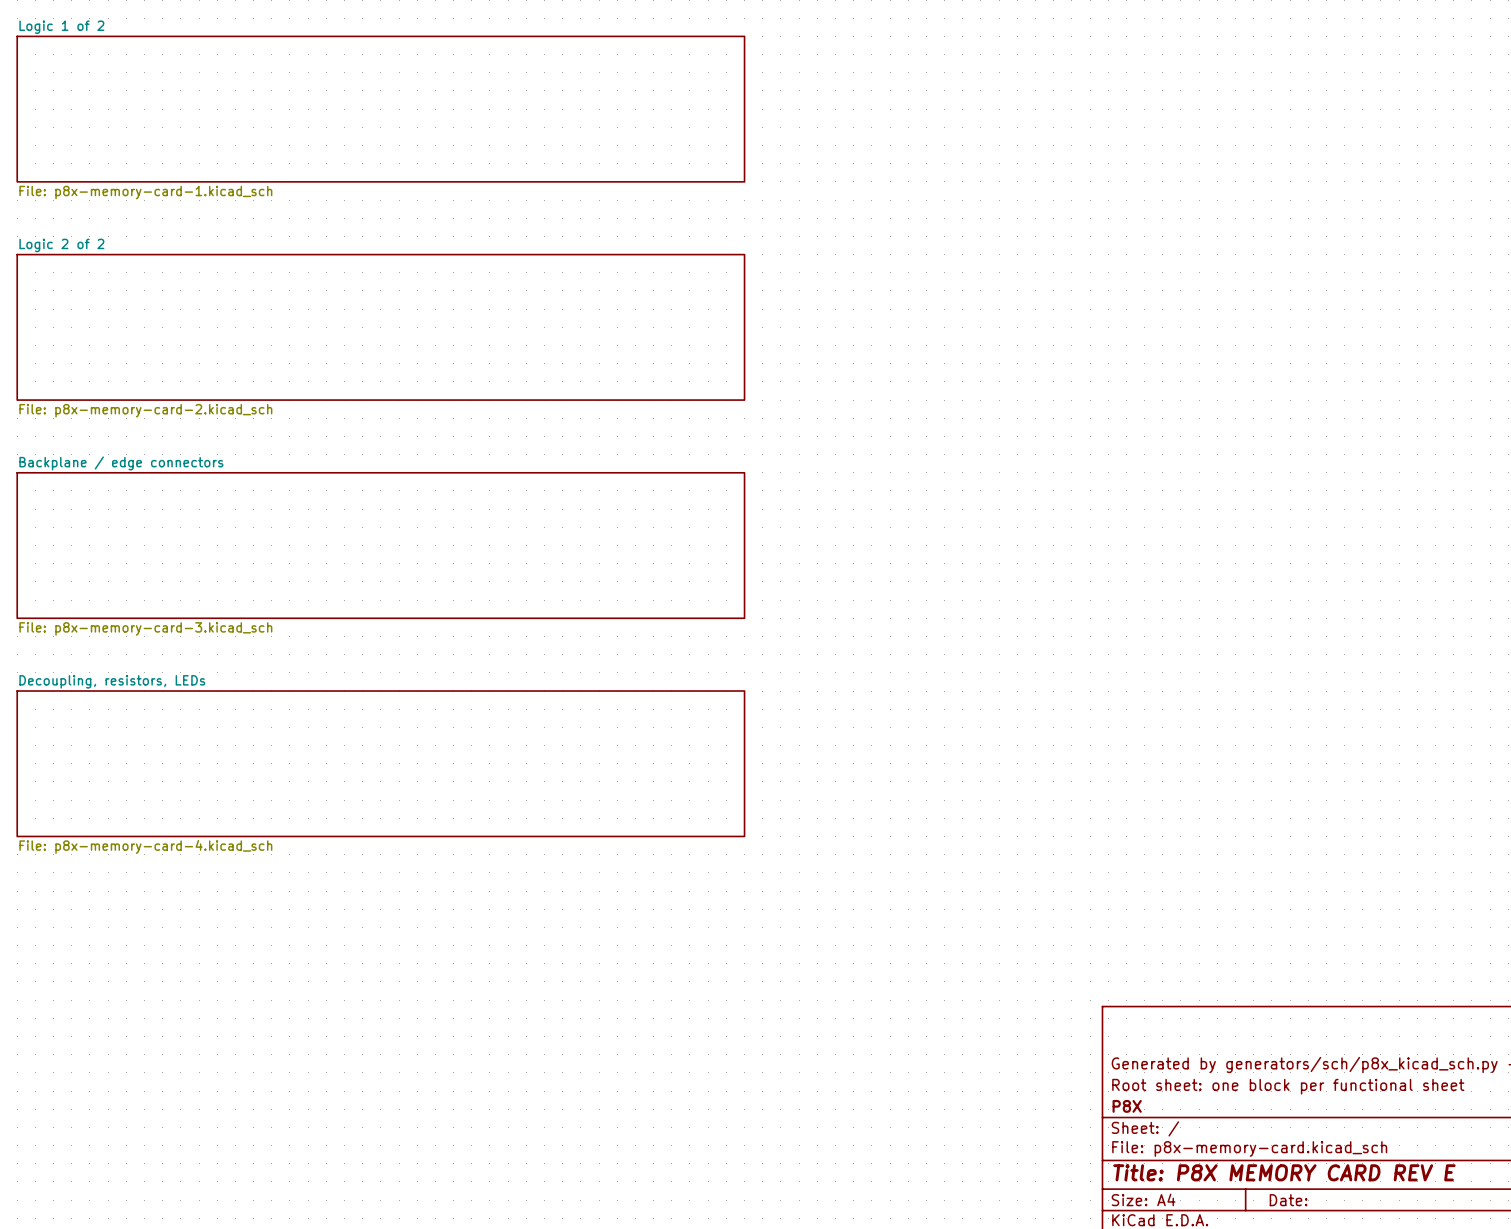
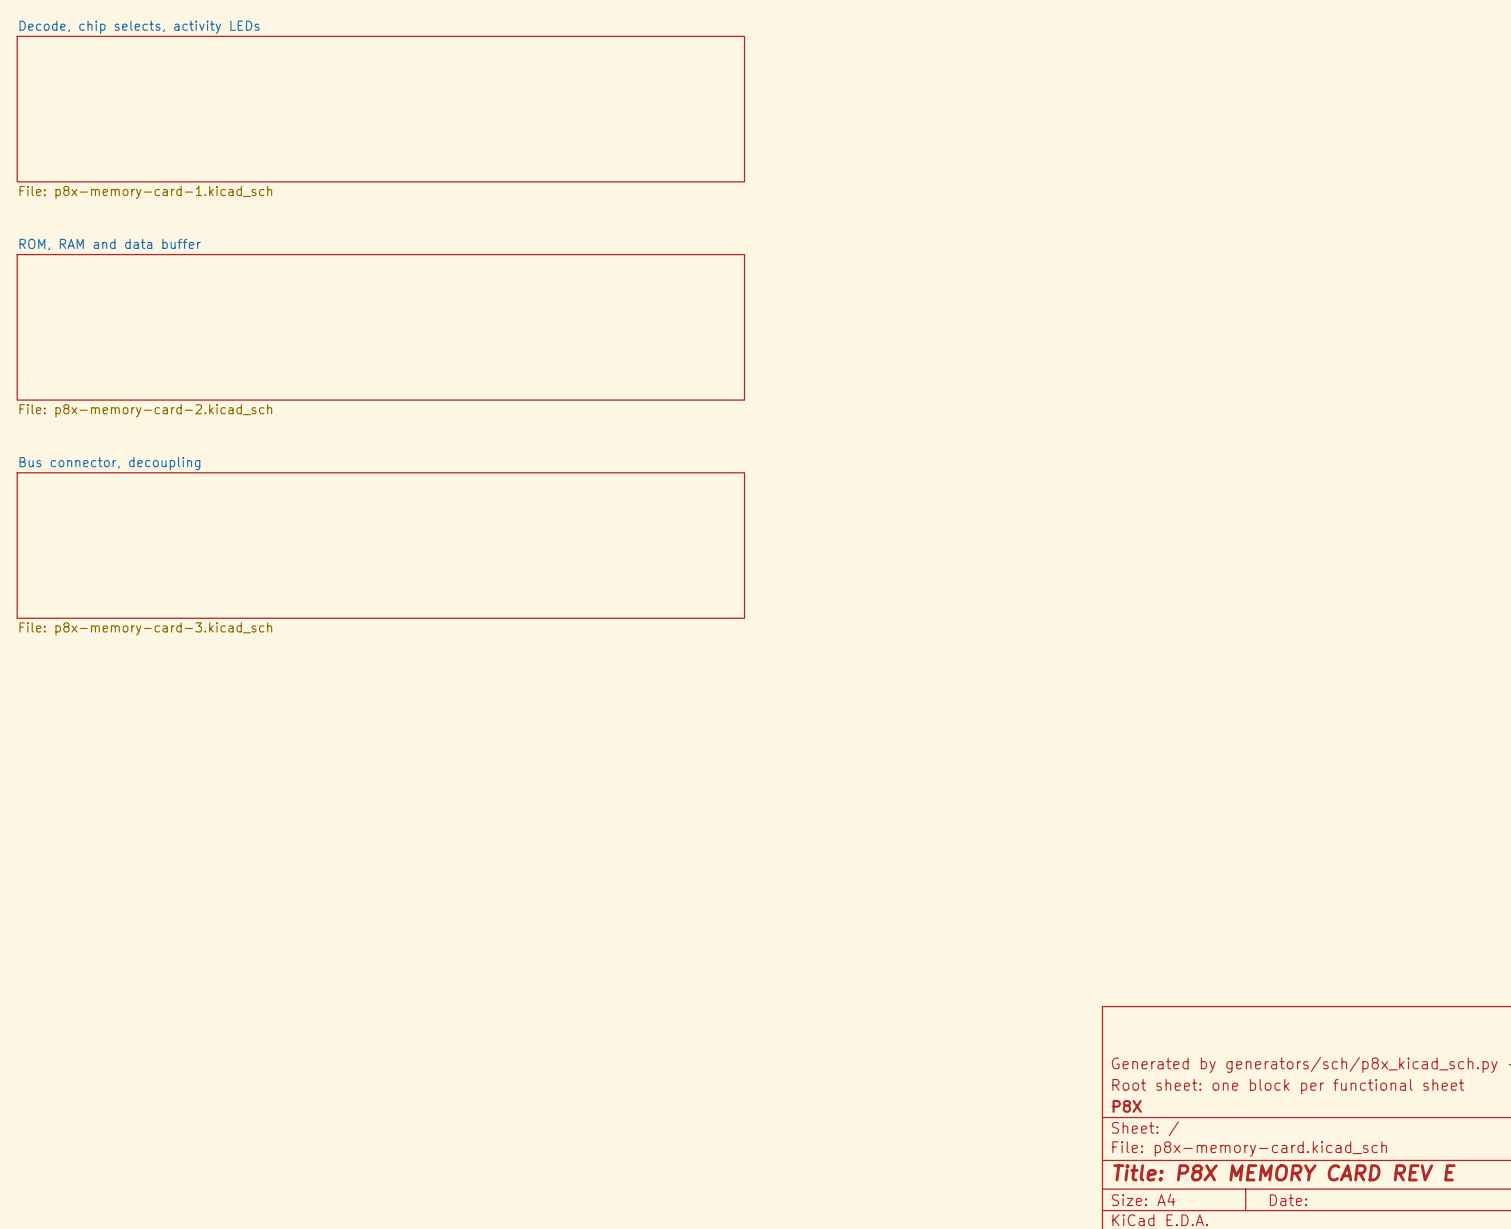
sheet Logic 1 of 2 name: Logic 1 of 2 (61, 27) -> Decode, chip selects, activity LEDs (139, 27)
sheet Logic 2 of 2 name: Logic 2 of 2 (61, 245) -> ROM, RAM and data buffer (110, 244)
sheet Backplane / edge connectors name: Backplane / edge connectors (121, 463) -> Bus connector, decoupling (109, 463)
sheet Decoupling, resistors, LEDs: File: p8x-memory-card-4.kicad_sch (380, 763) -> none

